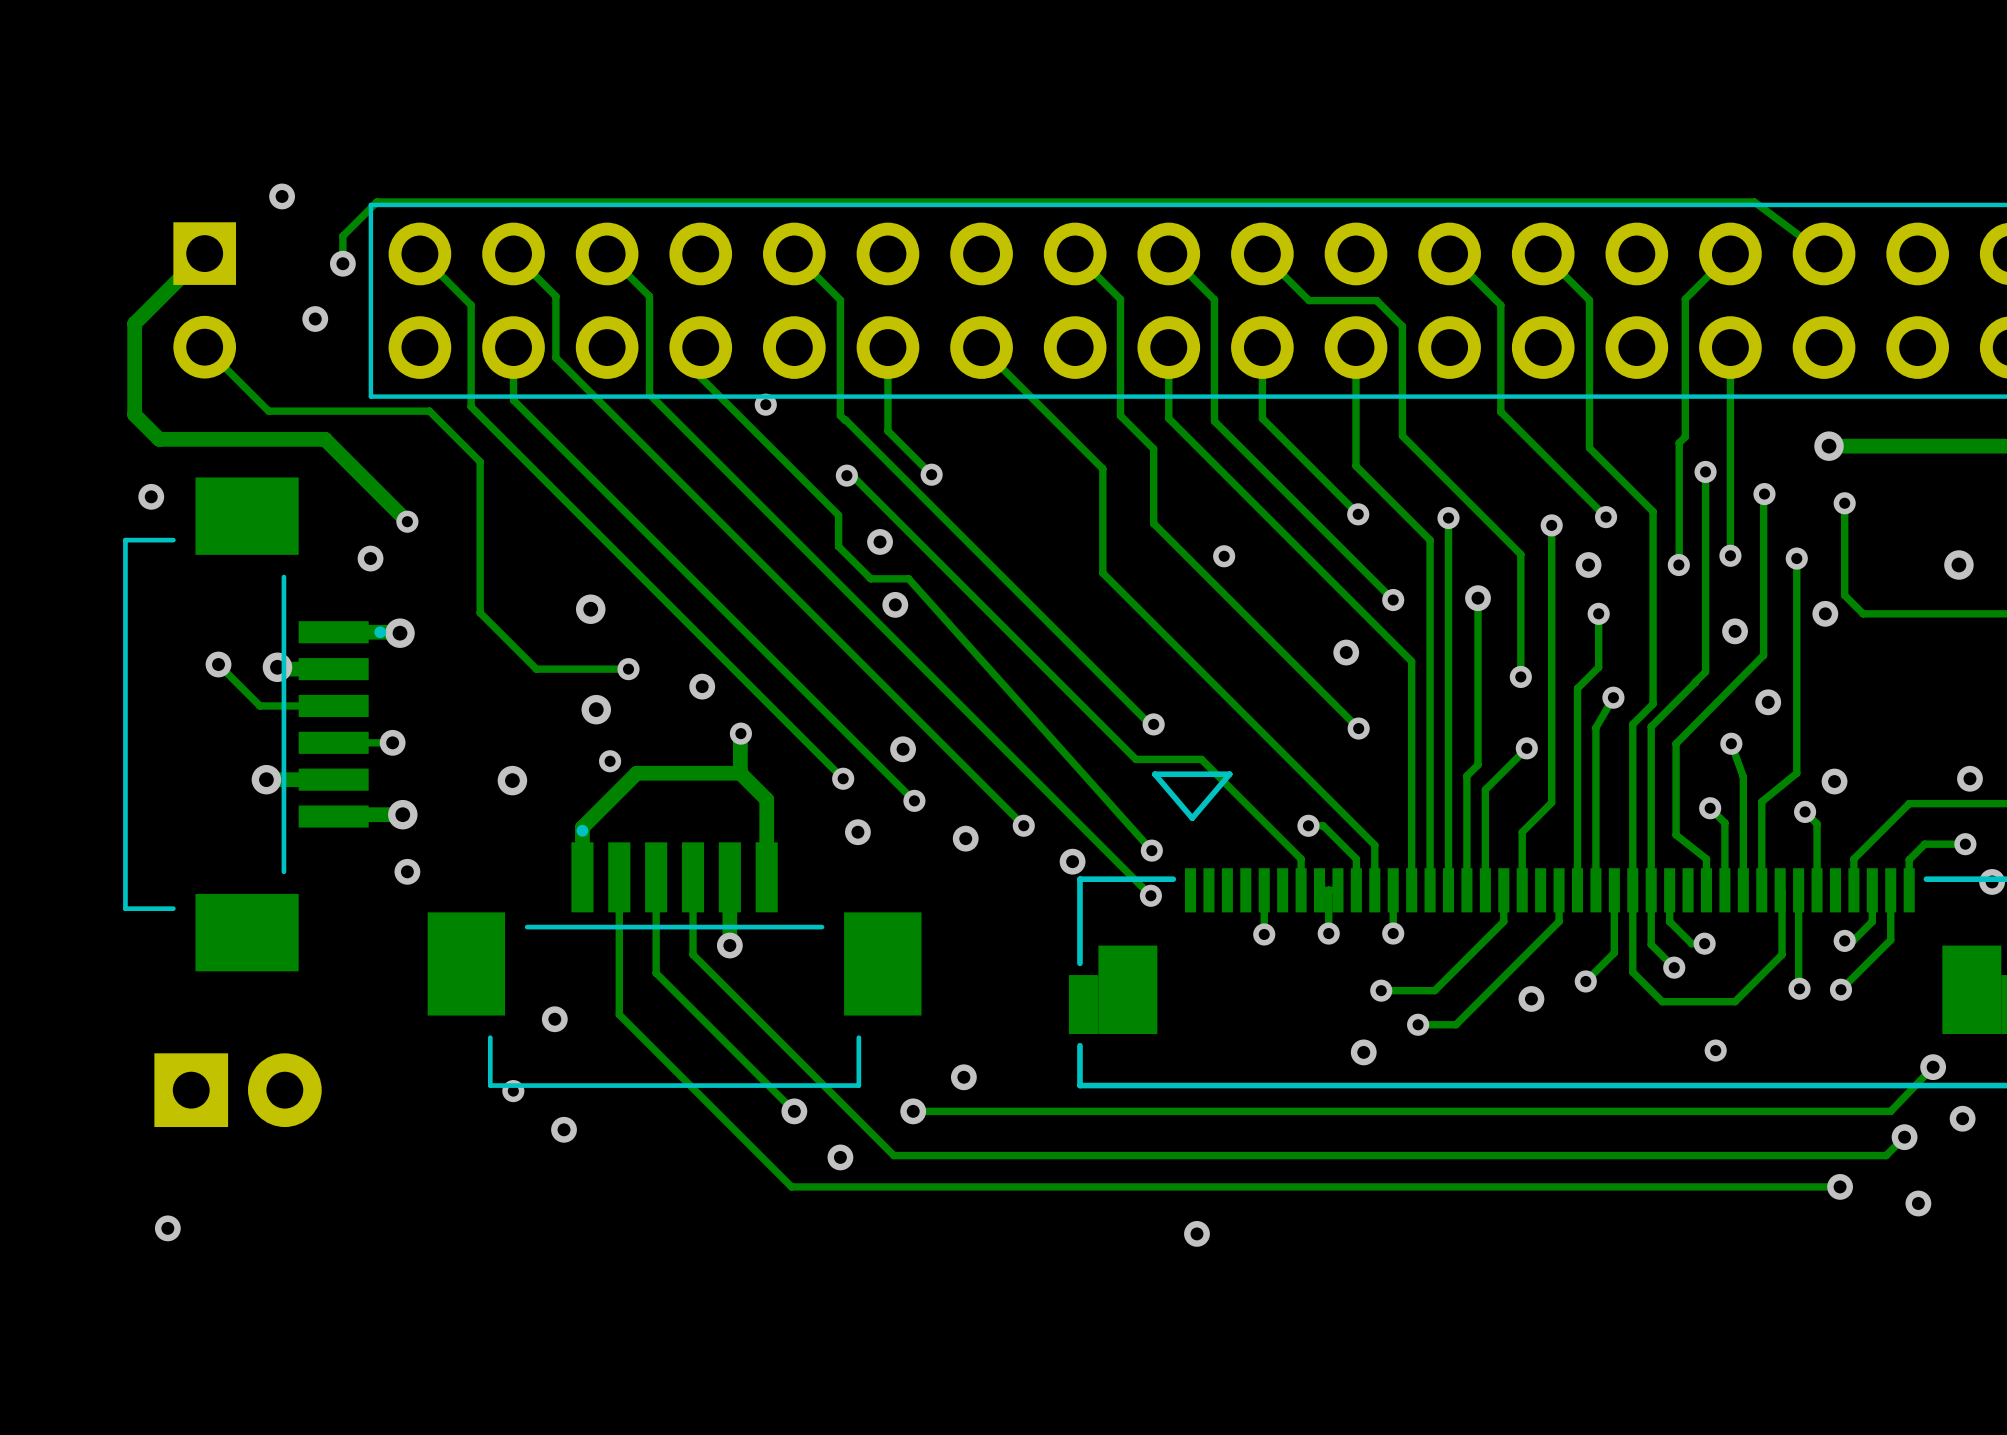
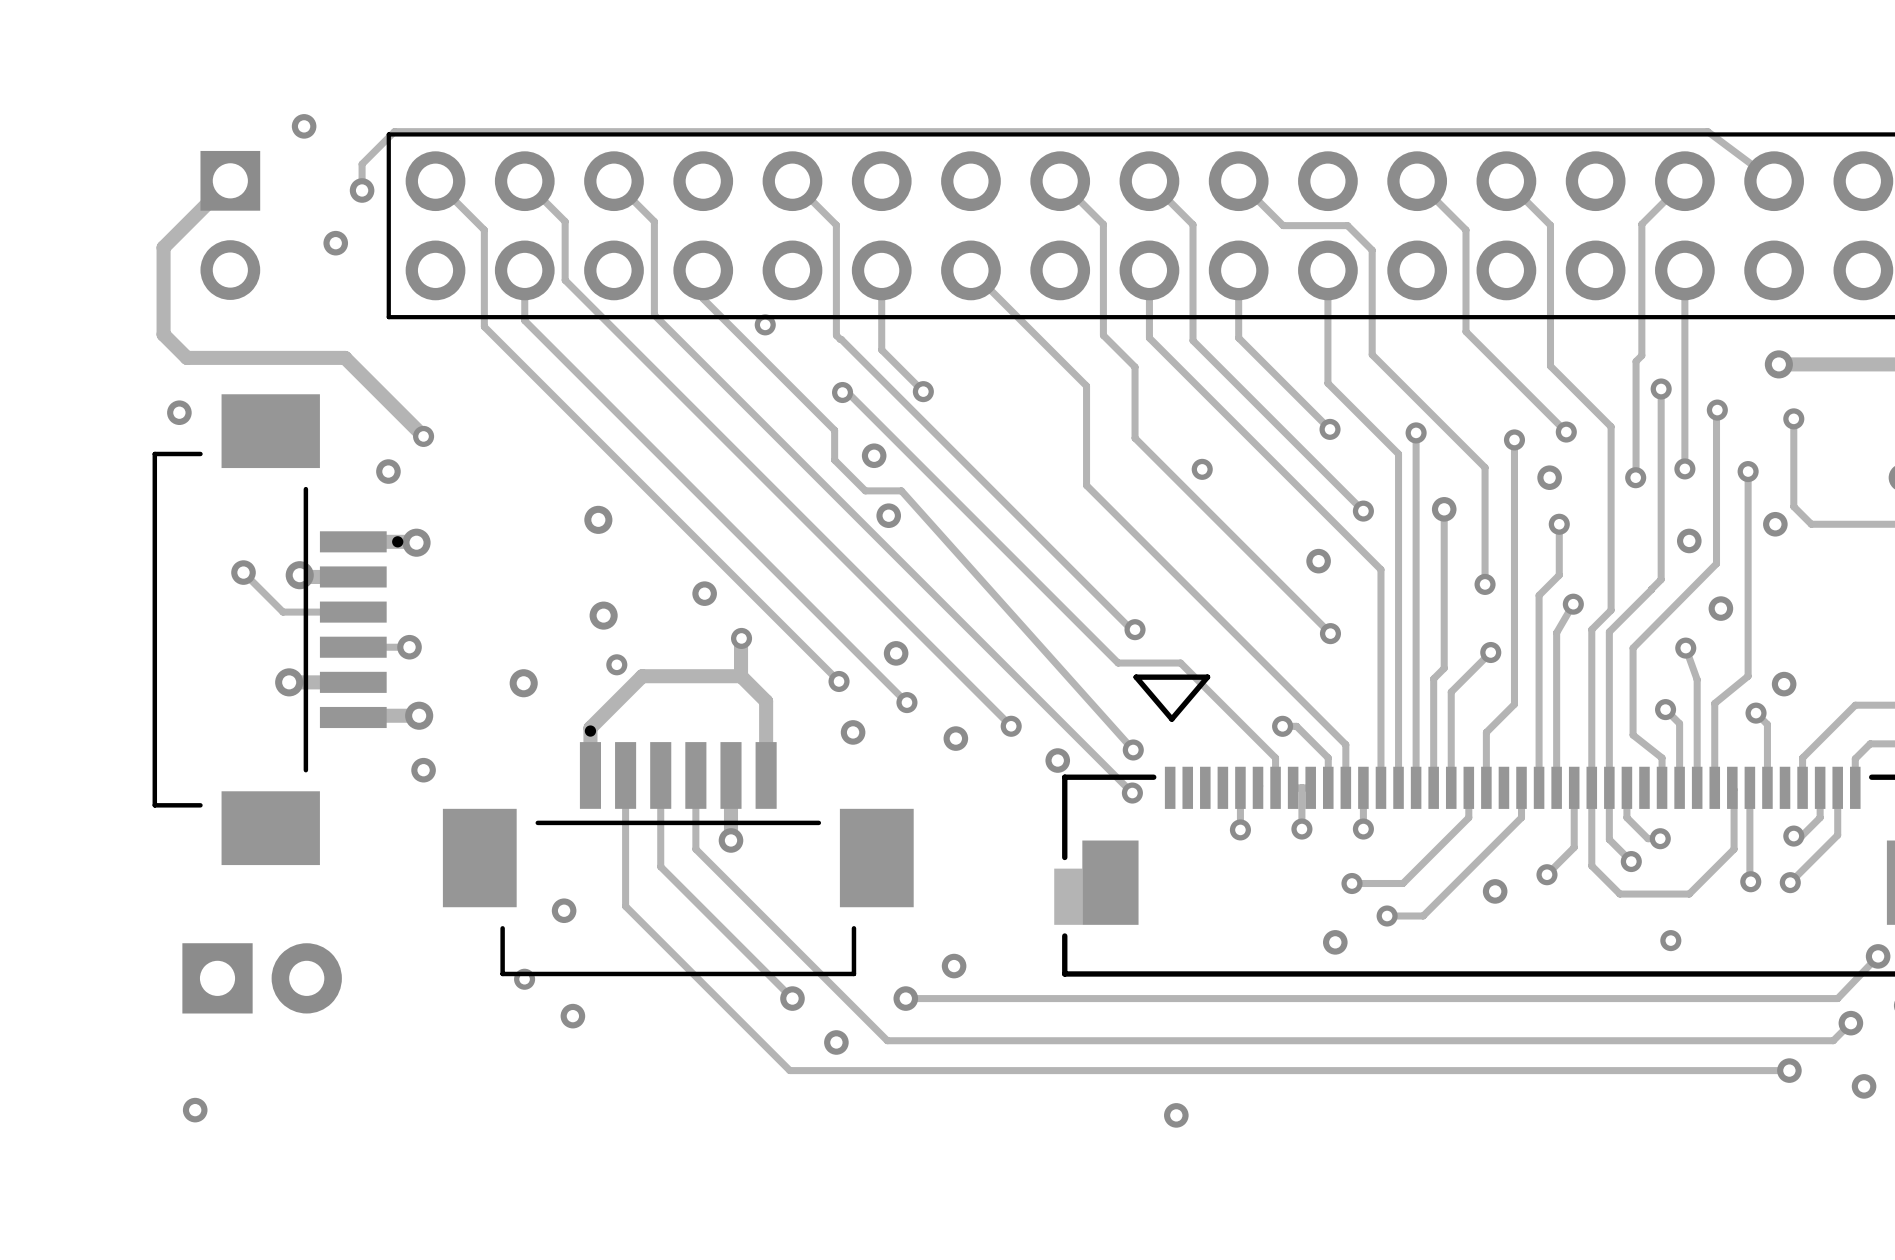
track: (204, 347) (268, 411) (429, 411) (480, 461) (480, 612) (536, 669) (628, 669) -> none
via: (628, 669) -> none

